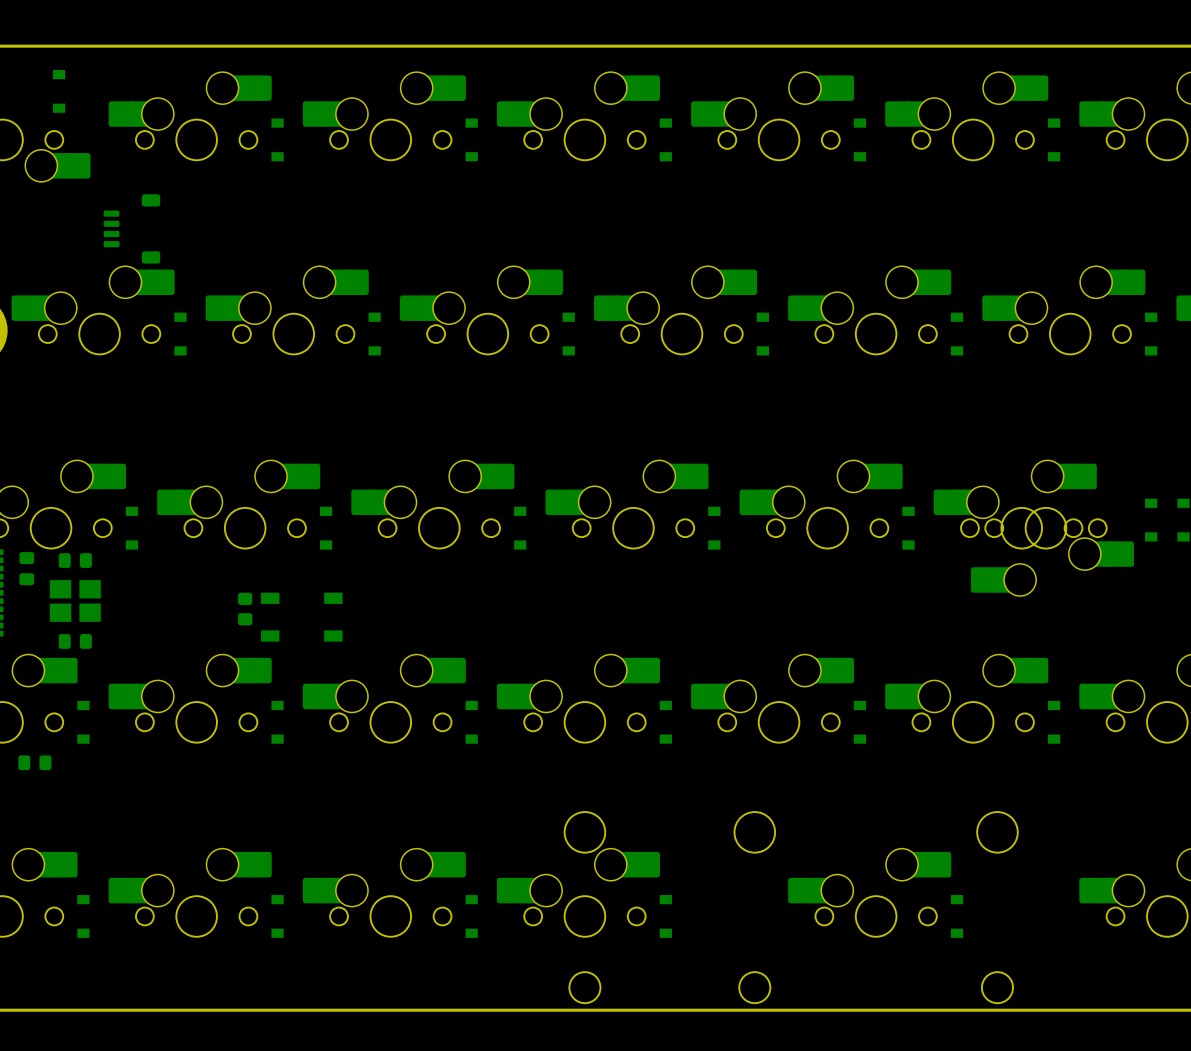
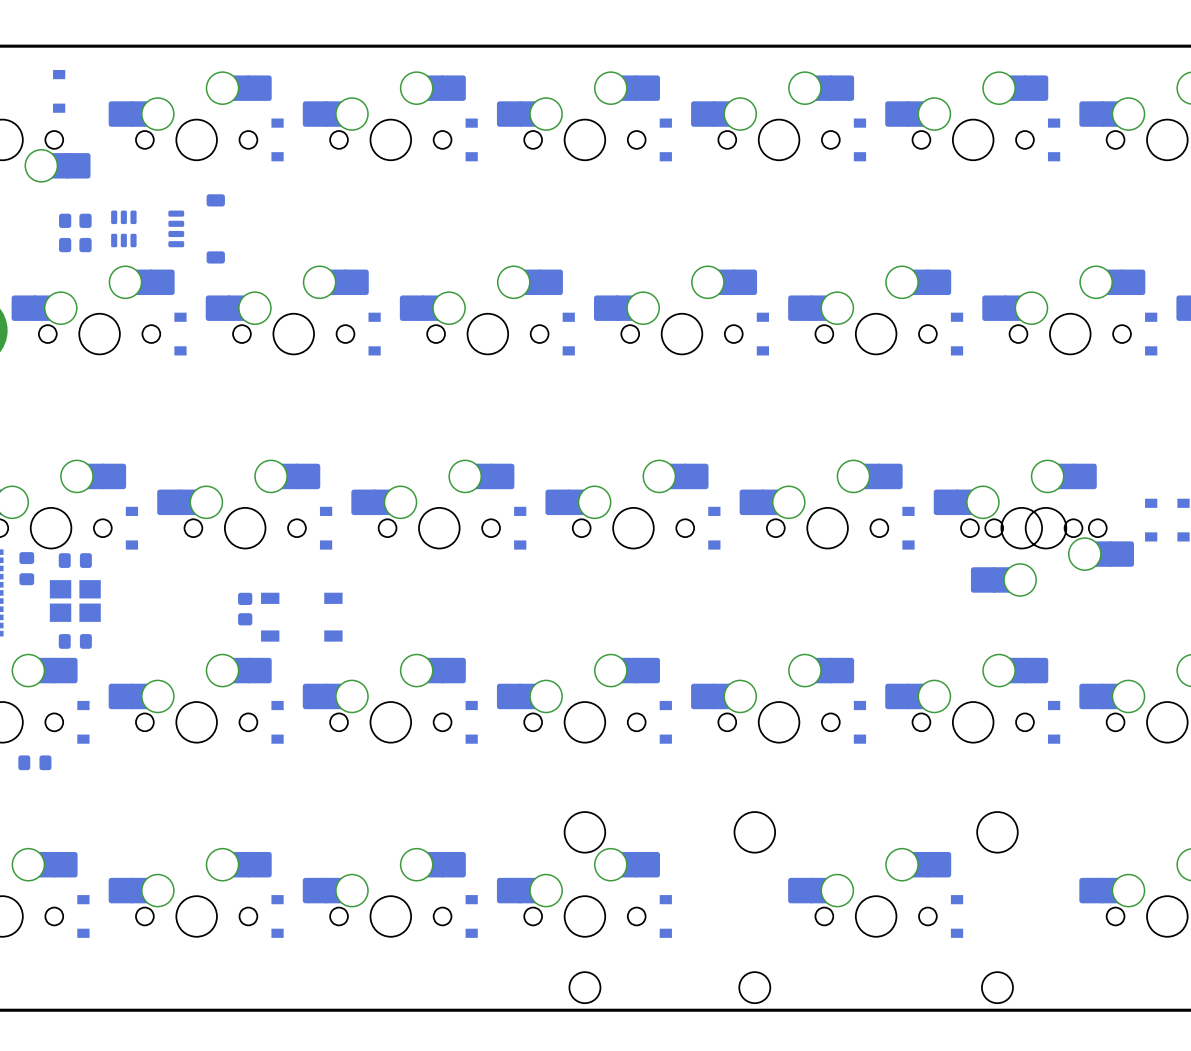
part footprint: [103, 194, 161, 264] -> [111, 210, 137, 248]
part: none -> (75, 220)
part: none -> (196, 228)
part: none -> (75, 245)

